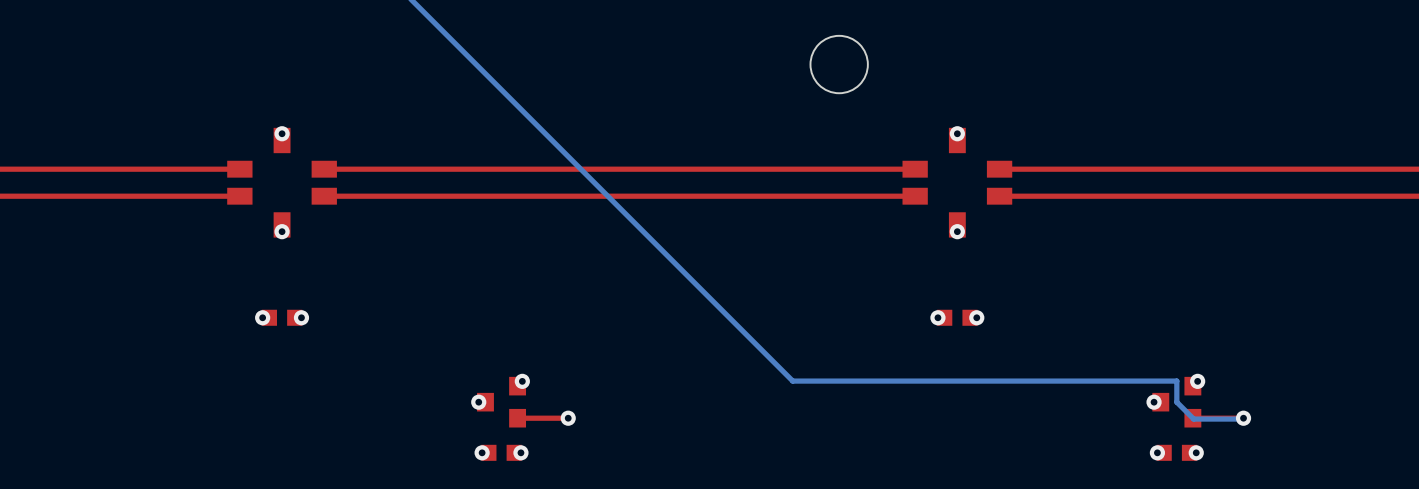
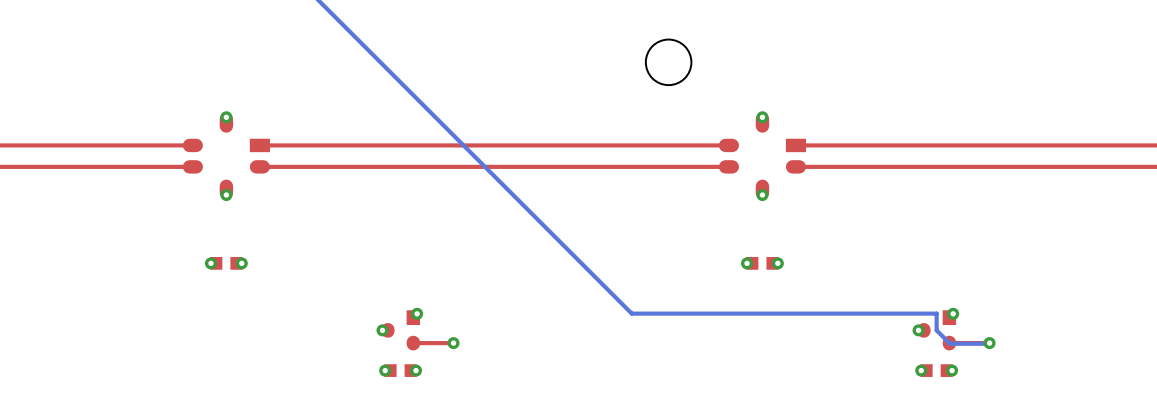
part footprint: [227, 127, 337, 238] -> [182, 112, 270, 200]
part footprint: [902, 127, 1013, 238] -> [718, 112, 806, 200]
part footprint: [477, 376, 527, 428] -> [381, 310, 421, 351]
part footprint: [1152, 376, 1202, 428] -> [917, 310, 957, 351]

